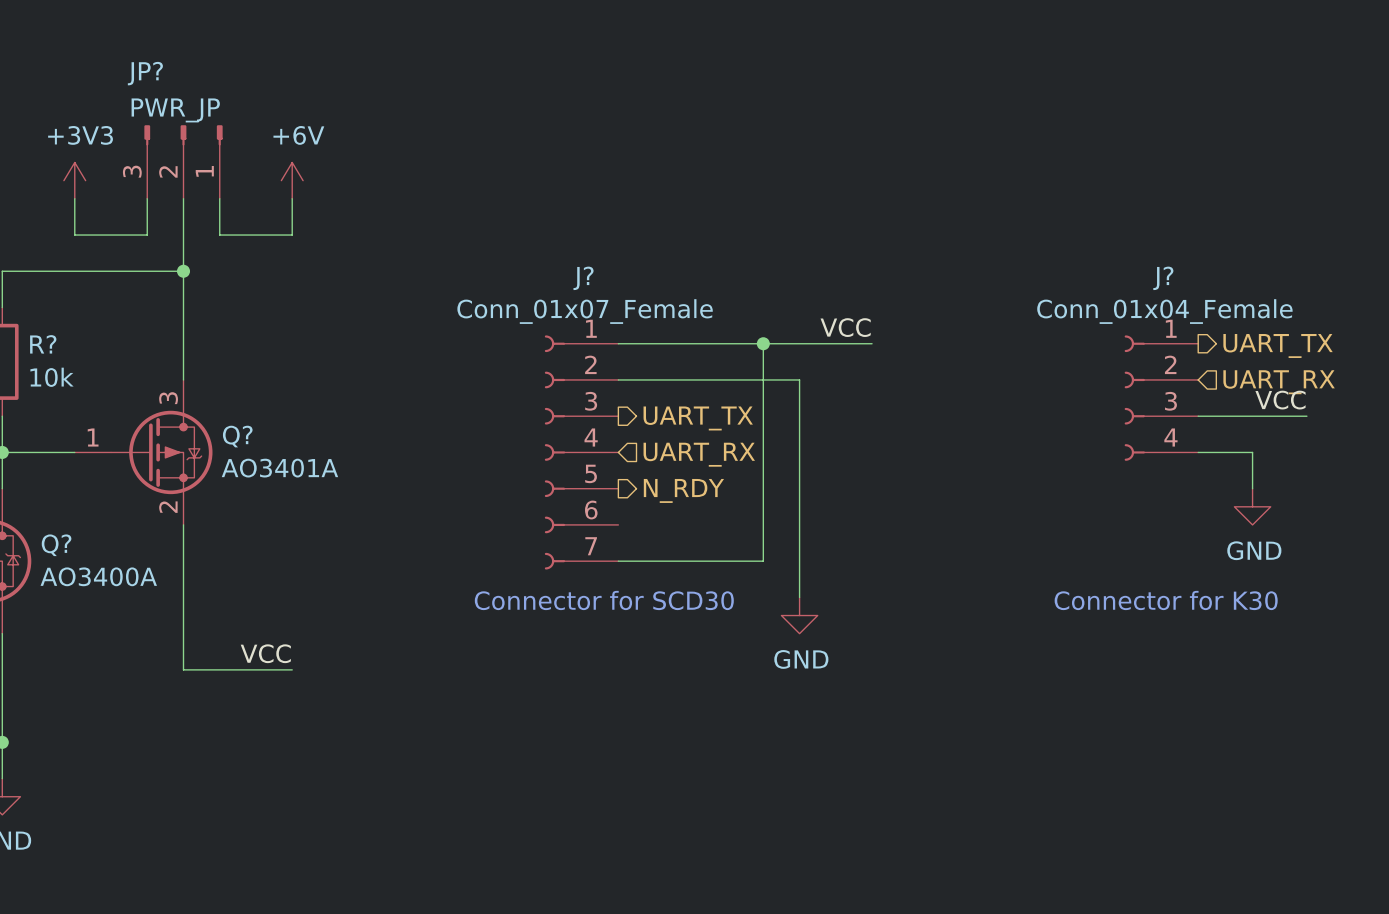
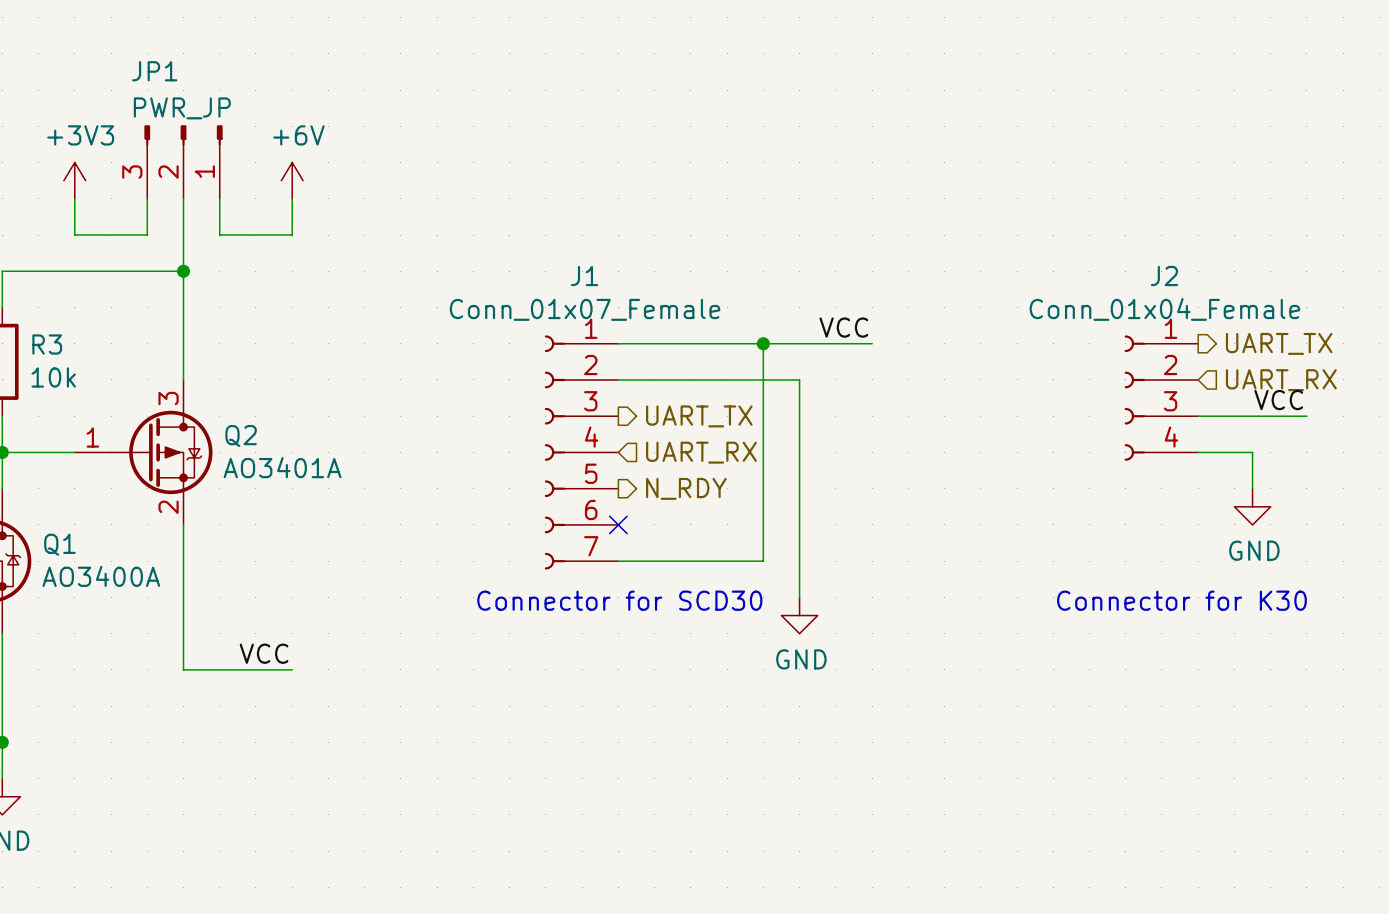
JP? name: JP? (145, 73) -> JP1 (154, 71)
J? name: J? (583, 278) -> J1 (584, 276)
J? name: J? (1163, 278) -> J2 (1164, 276)
R? name: R? (43, 344) -> R3 (47, 344)
Q? name: Q? (237, 436) -> Q2 (241, 435)
no-connect mark: none -> (618, 524)
Q? name: Q? (56, 545) -> Q1 (59, 544)

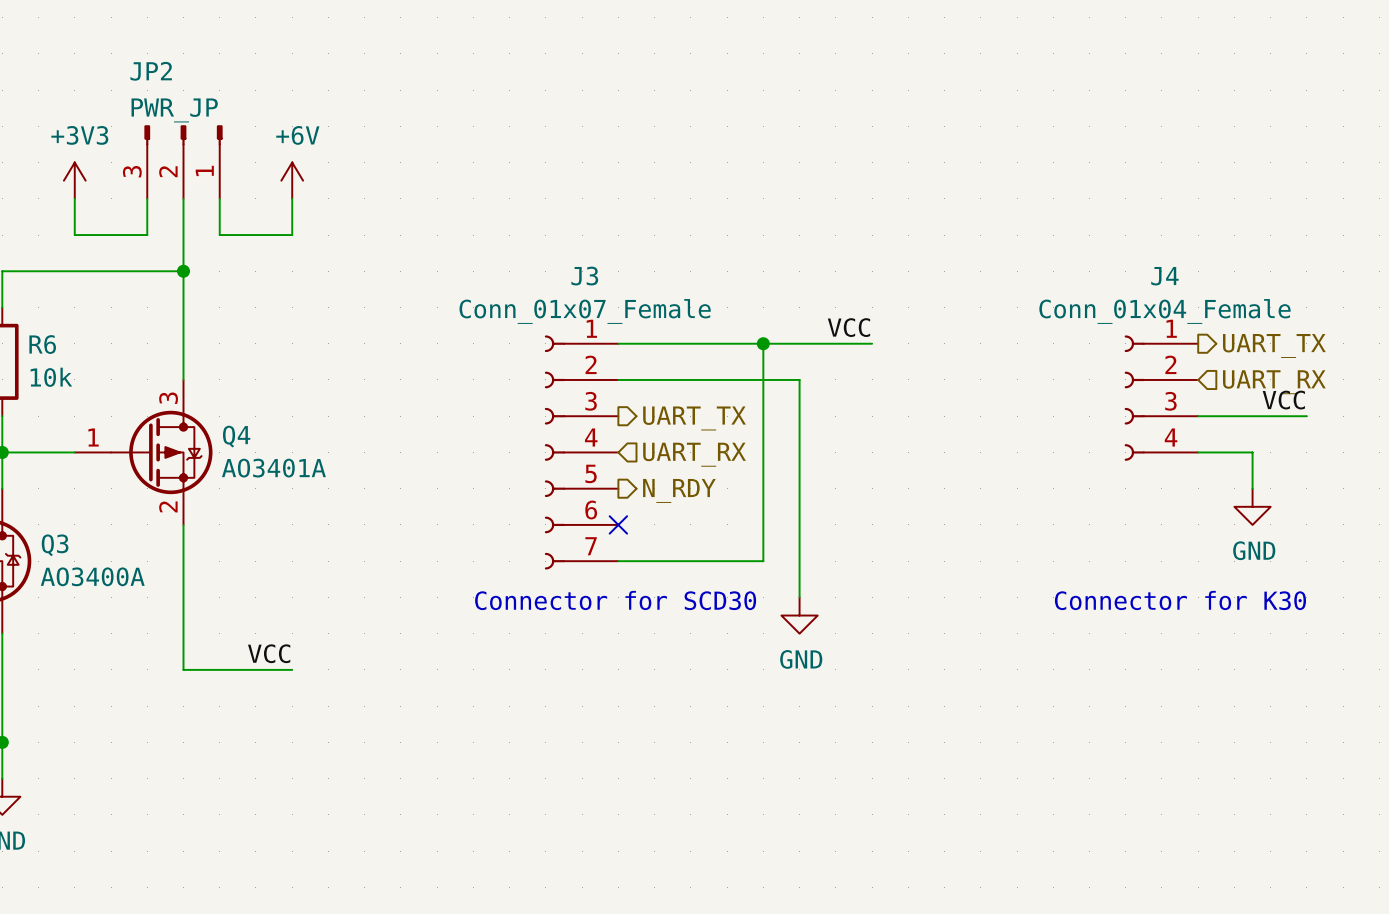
JP1 name: JP1 (154, 71) -> JP2 (151, 71)
J1 name: J1 (584, 276) -> J3 (584, 276)
J2 name: J2 (1164, 276) -> J4 (1164, 276)
R3 name: R3 (47, 344) -> R6 (42, 344)
Q2 name: Q2 (241, 435) -> Q4 (236, 436)
Q1 name: Q1 (59, 544) -> Q3 (55, 545)

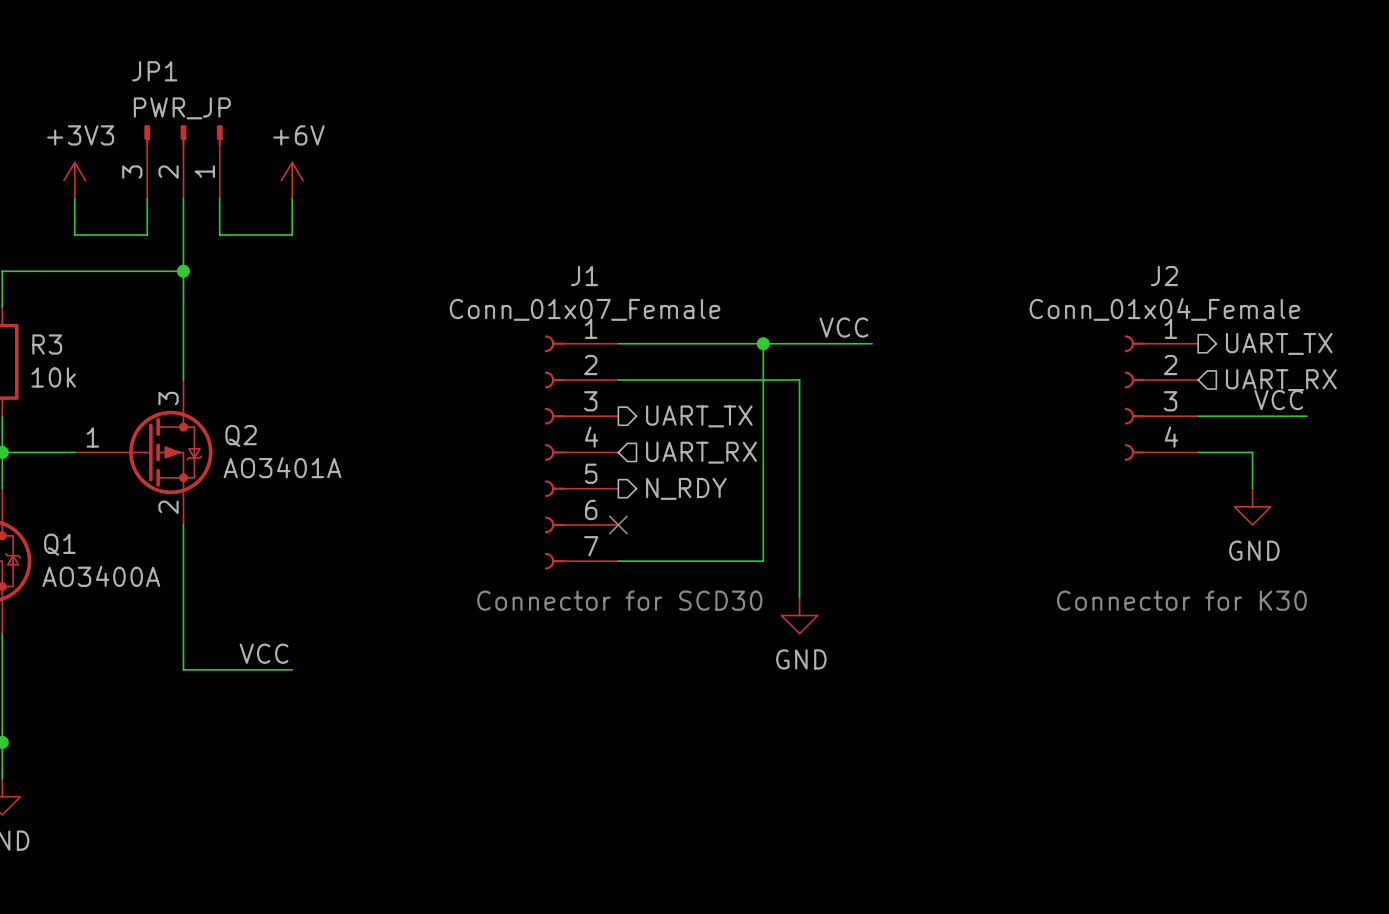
JP2 name: JP2 (151, 71) -> JP1 (154, 71)
J3 name: J3 (584, 276) -> J1 (584, 276)
J4 name: J4 (1164, 276) -> J2 (1164, 276)
R6 name: R6 (42, 344) -> R3 (47, 344)
Q4 name: Q4 (236, 436) -> Q2 (241, 435)
Q3 name: Q3 (55, 545) -> Q1 (59, 544)

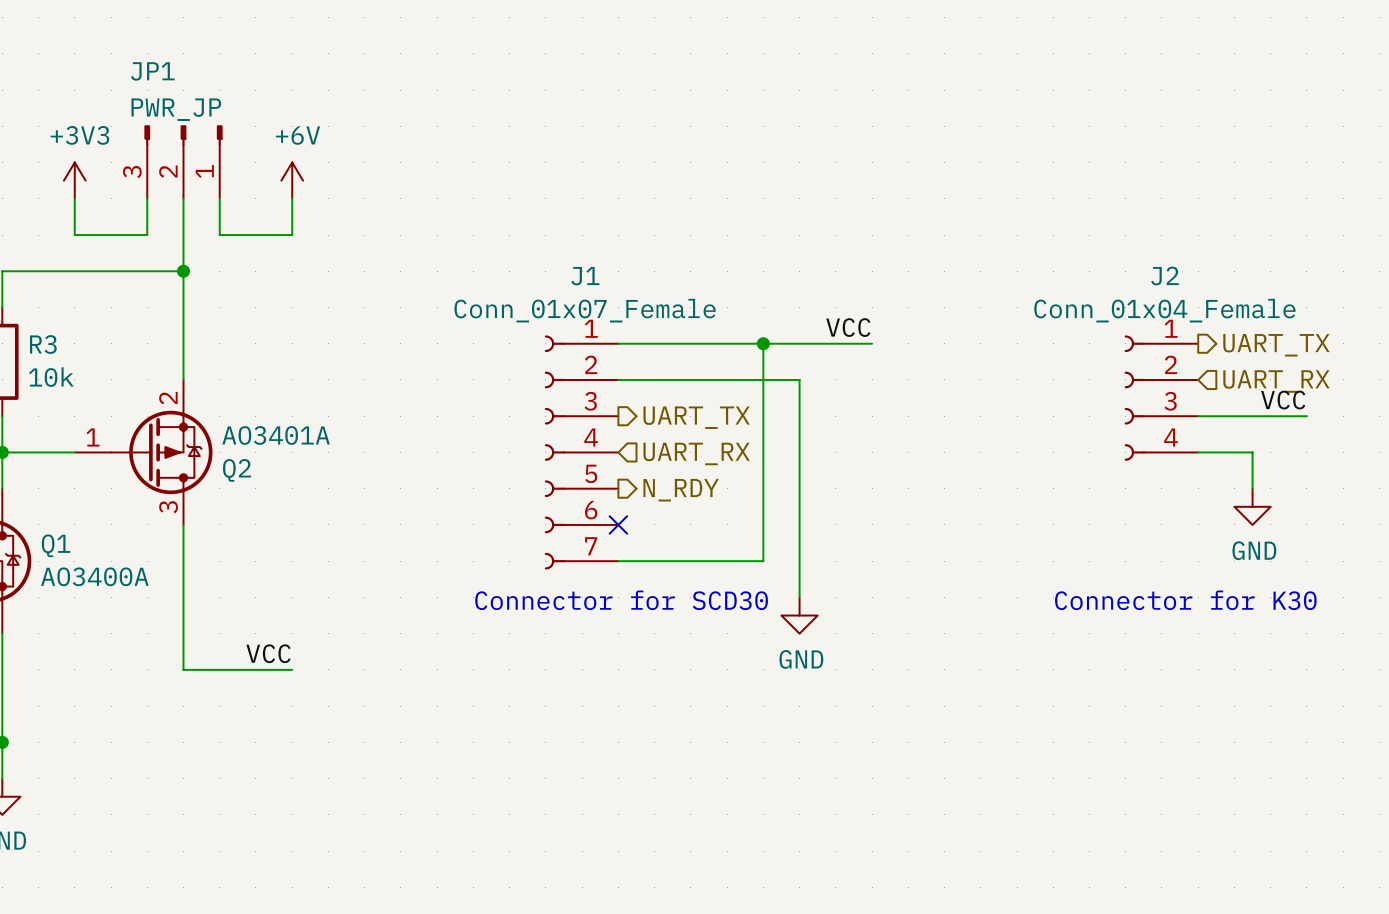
Q2 flip: as is (161, 452) -> up-down (161, 452)

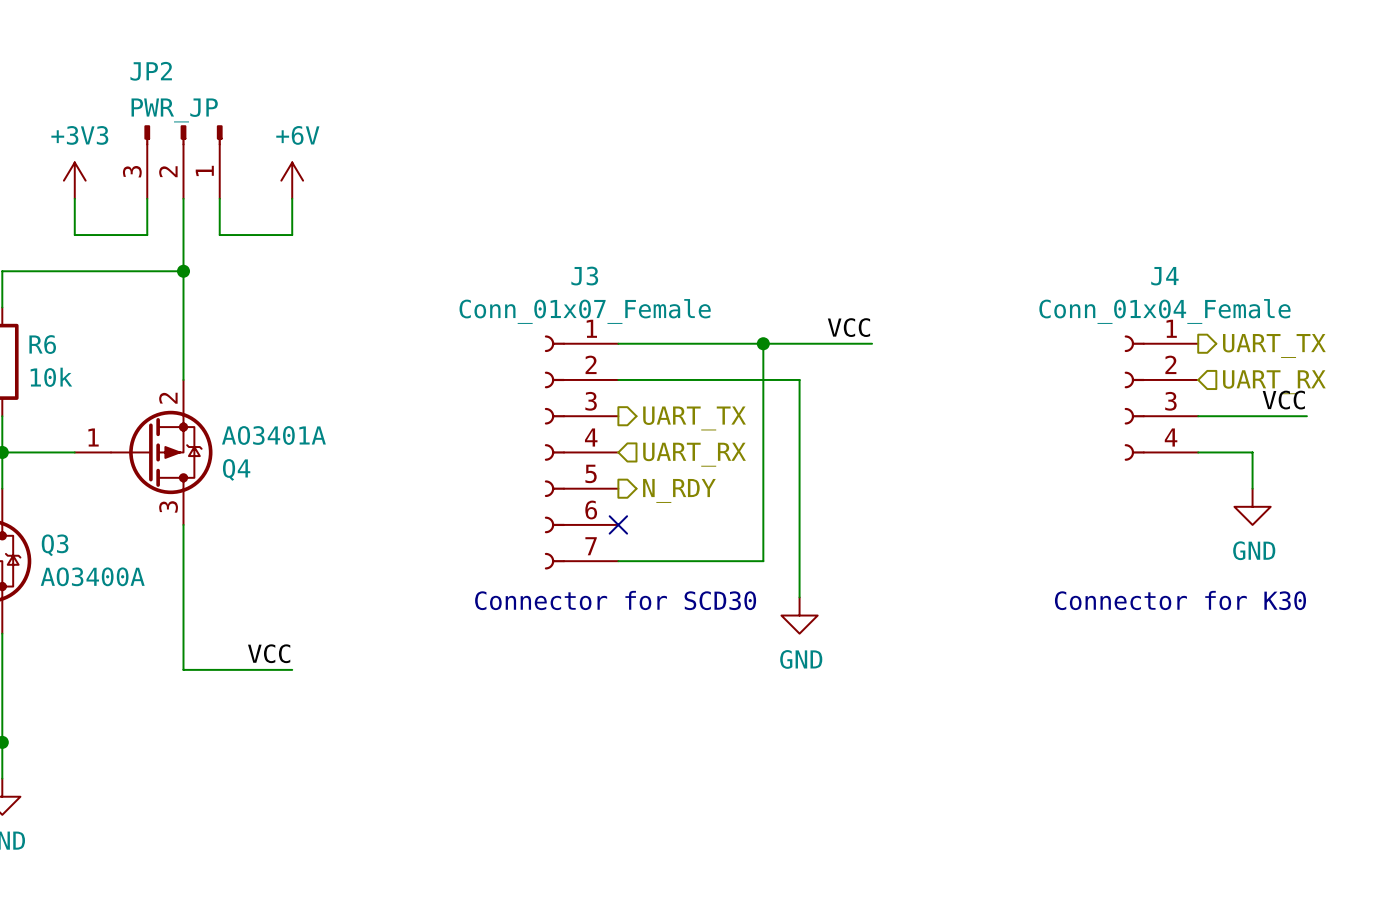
JP1 name: JP1 (152, 71) -> JP2 (151, 71)
J1 name: J1 (585, 276) -> J3 (584, 276)
J2 name: J2 (1165, 276) -> J4 (1164, 276)
R3 name: R3 (43, 344) -> R6 (42, 344)
Q2 name: Q2 (237, 470) -> Q4 (236, 469)
Q1 name: Q1 (56, 545) -> Q3 (55, 545)

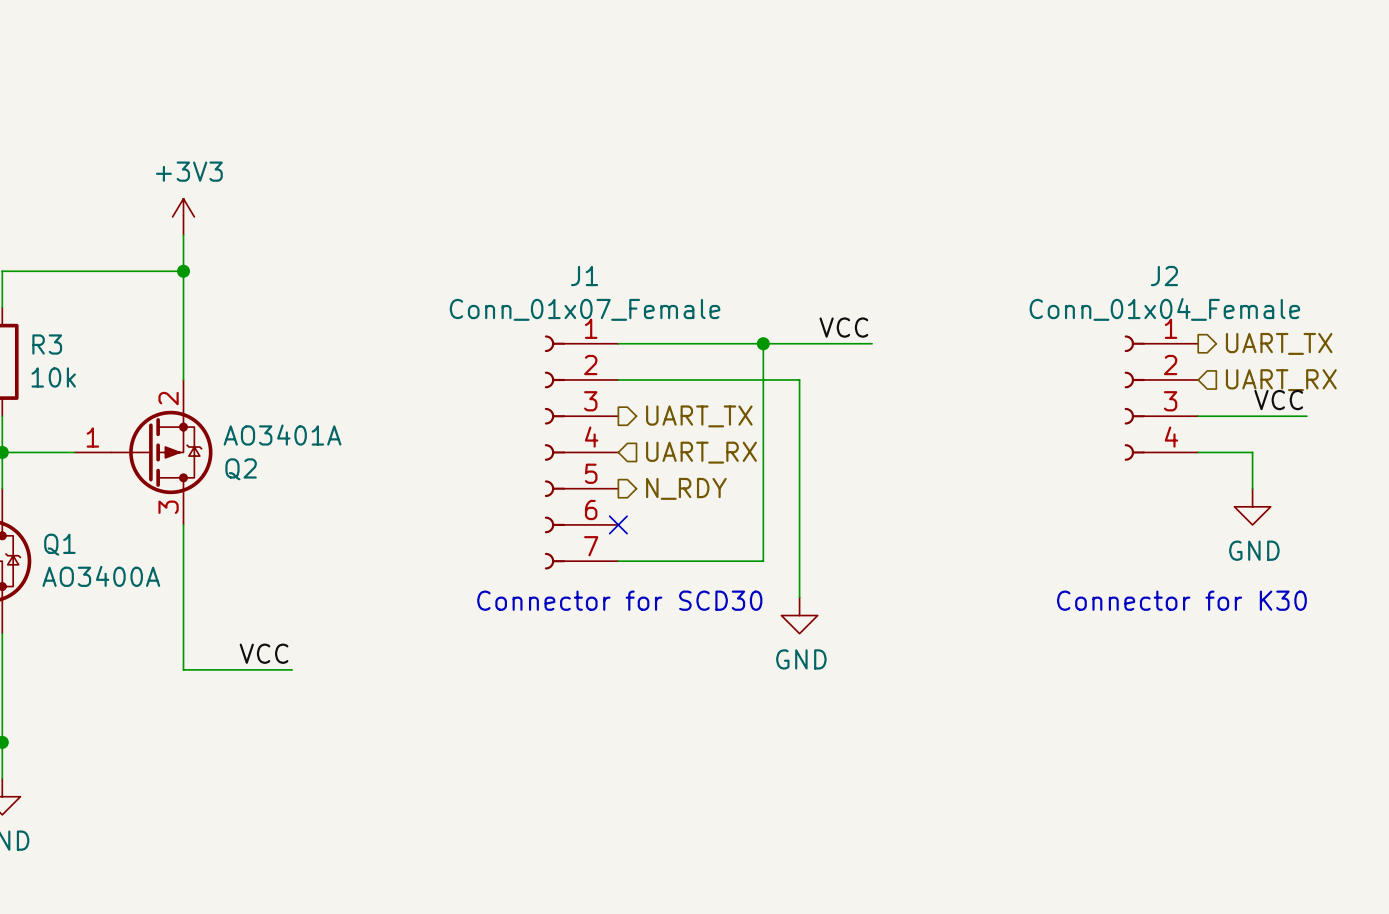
JP2: PWR_JP (183, 162) -> none
power symbol position: +3V3 (74, 180) -> +3V3 (183, 216)
power symbol: +6V (292, 180) -> none
wire: (74, 198) (74, 235) (147, 235) (147, 198) -> none
wire: (219, 198) (219, 235) (292, 235) (292, 198) -> none
J3 name: J3 (584, 276) -> J1 (584, 276)
J4 name: J4 (1164, 276) -> J2 (1164, 276)
R6 name: R6 (42, 344) -> R3 (47, 344)
Q4 name: Q4 (236, 469) -> Q2 (241, 469)
Q3 name: Q3 (55, 545) -> Q1 (59, 544)

